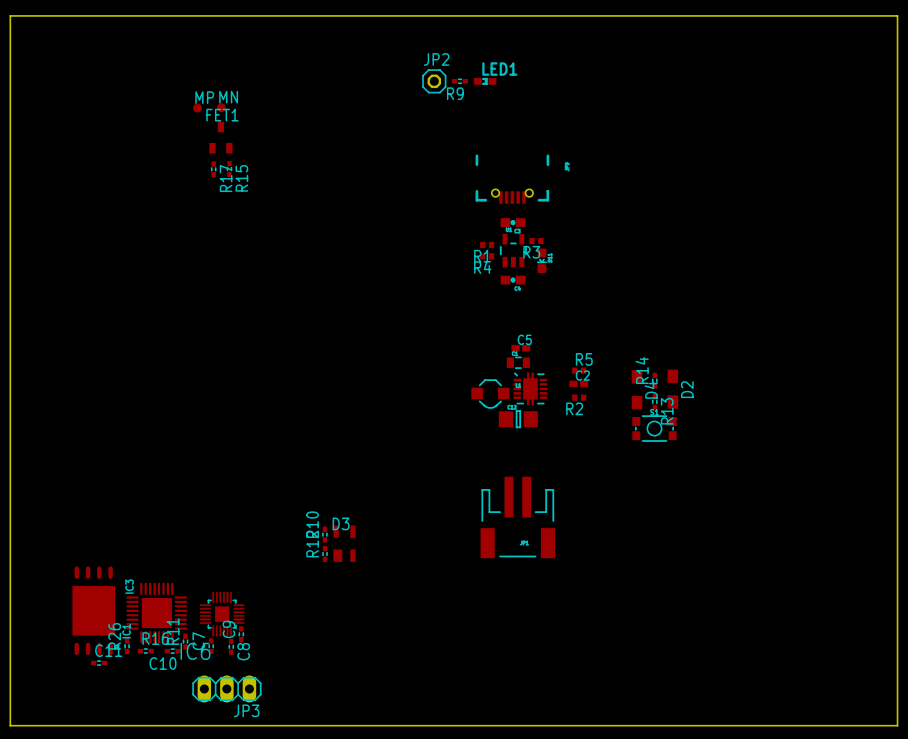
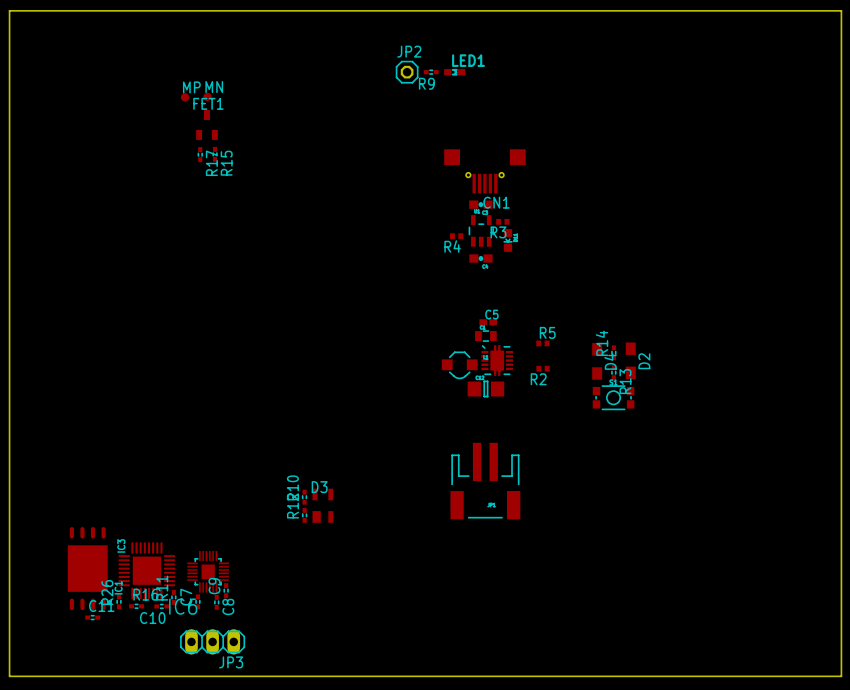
part: (512, 179) -> none
CN1: none -> (484, 171)
R1: (487, 244) -> none
C2: (578, 383) -> none

